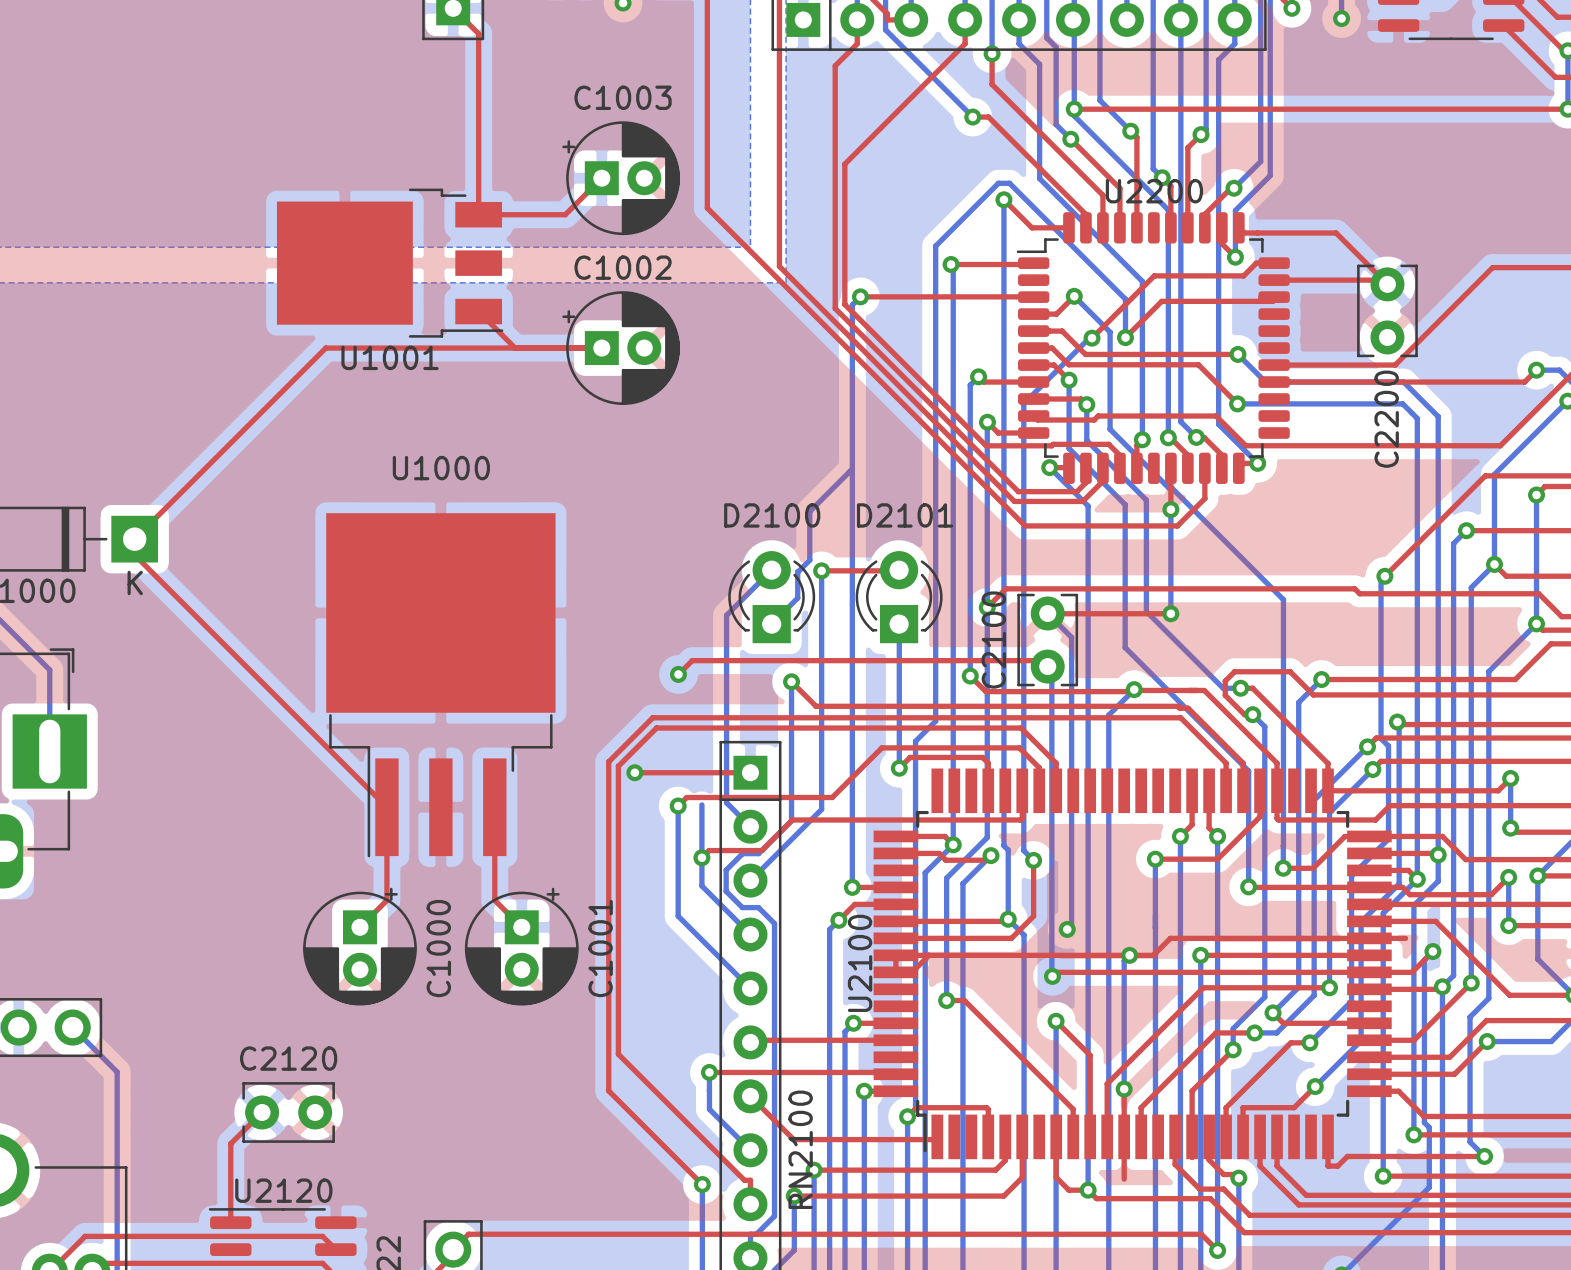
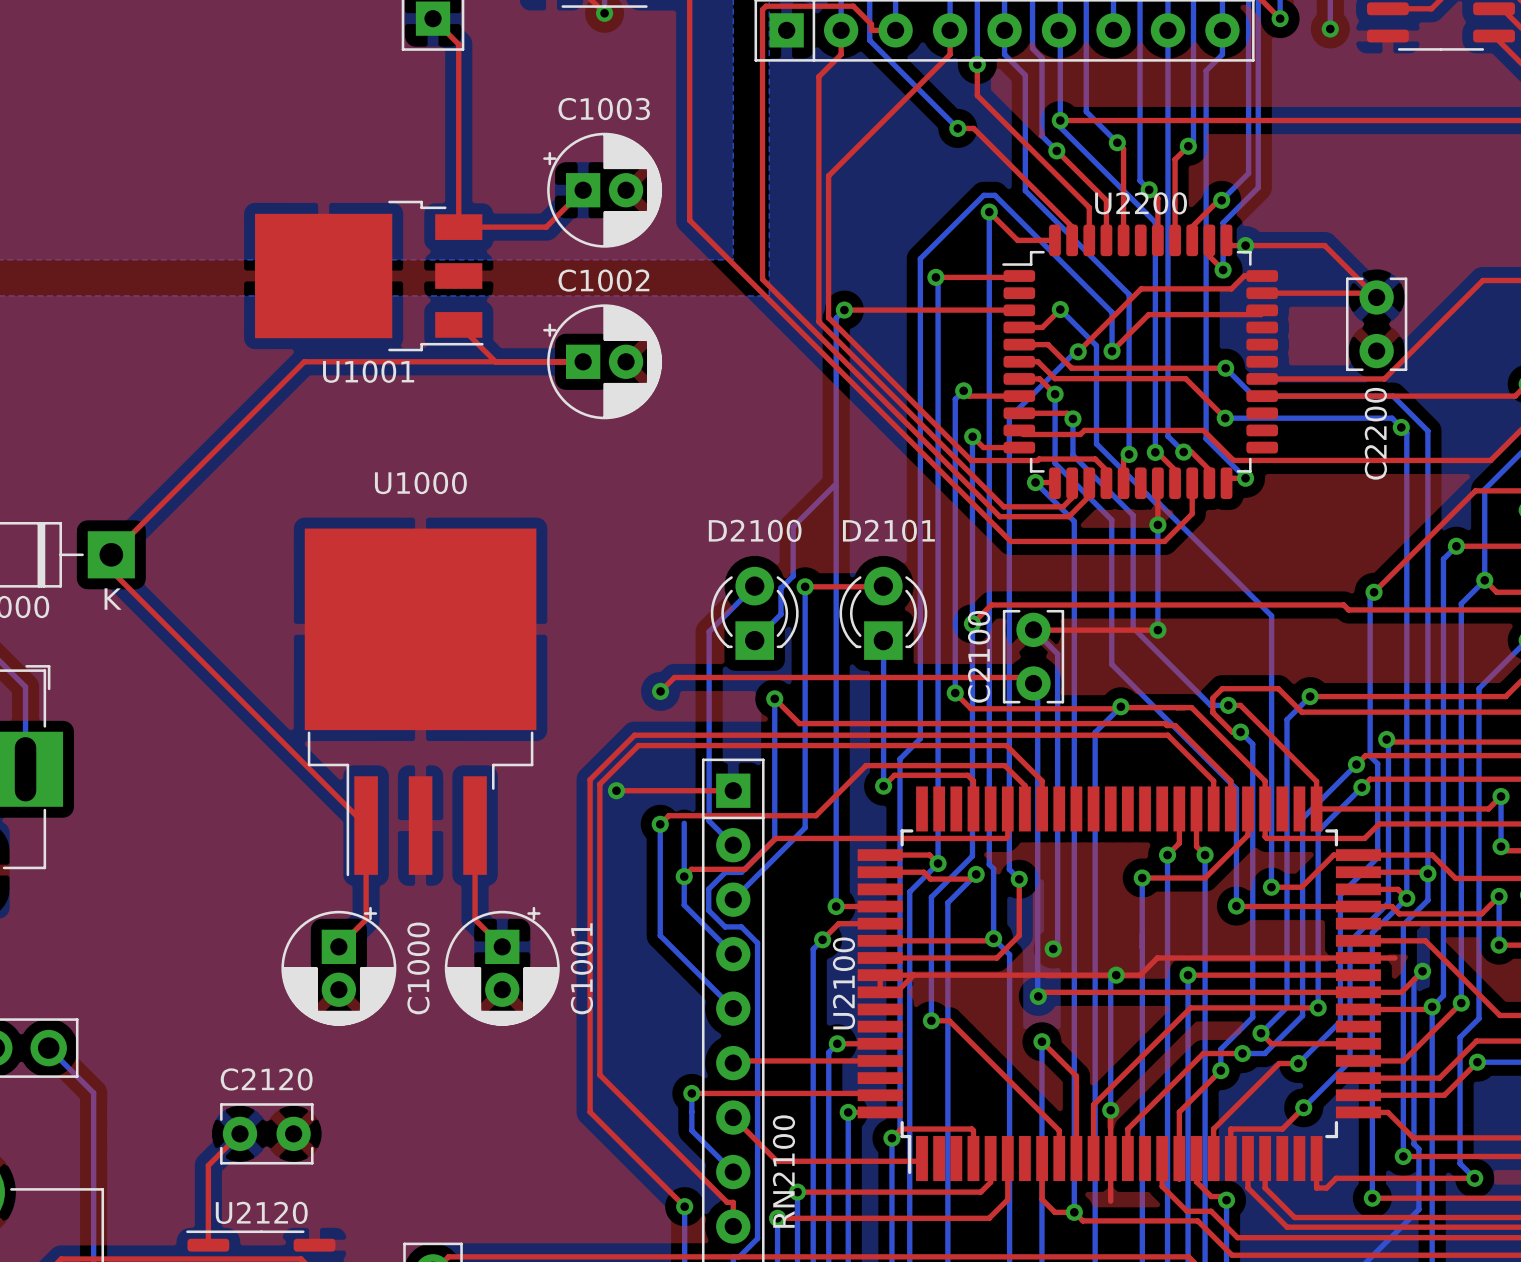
via: none -> (1245, 245)
via: none -> (1401, 427)

